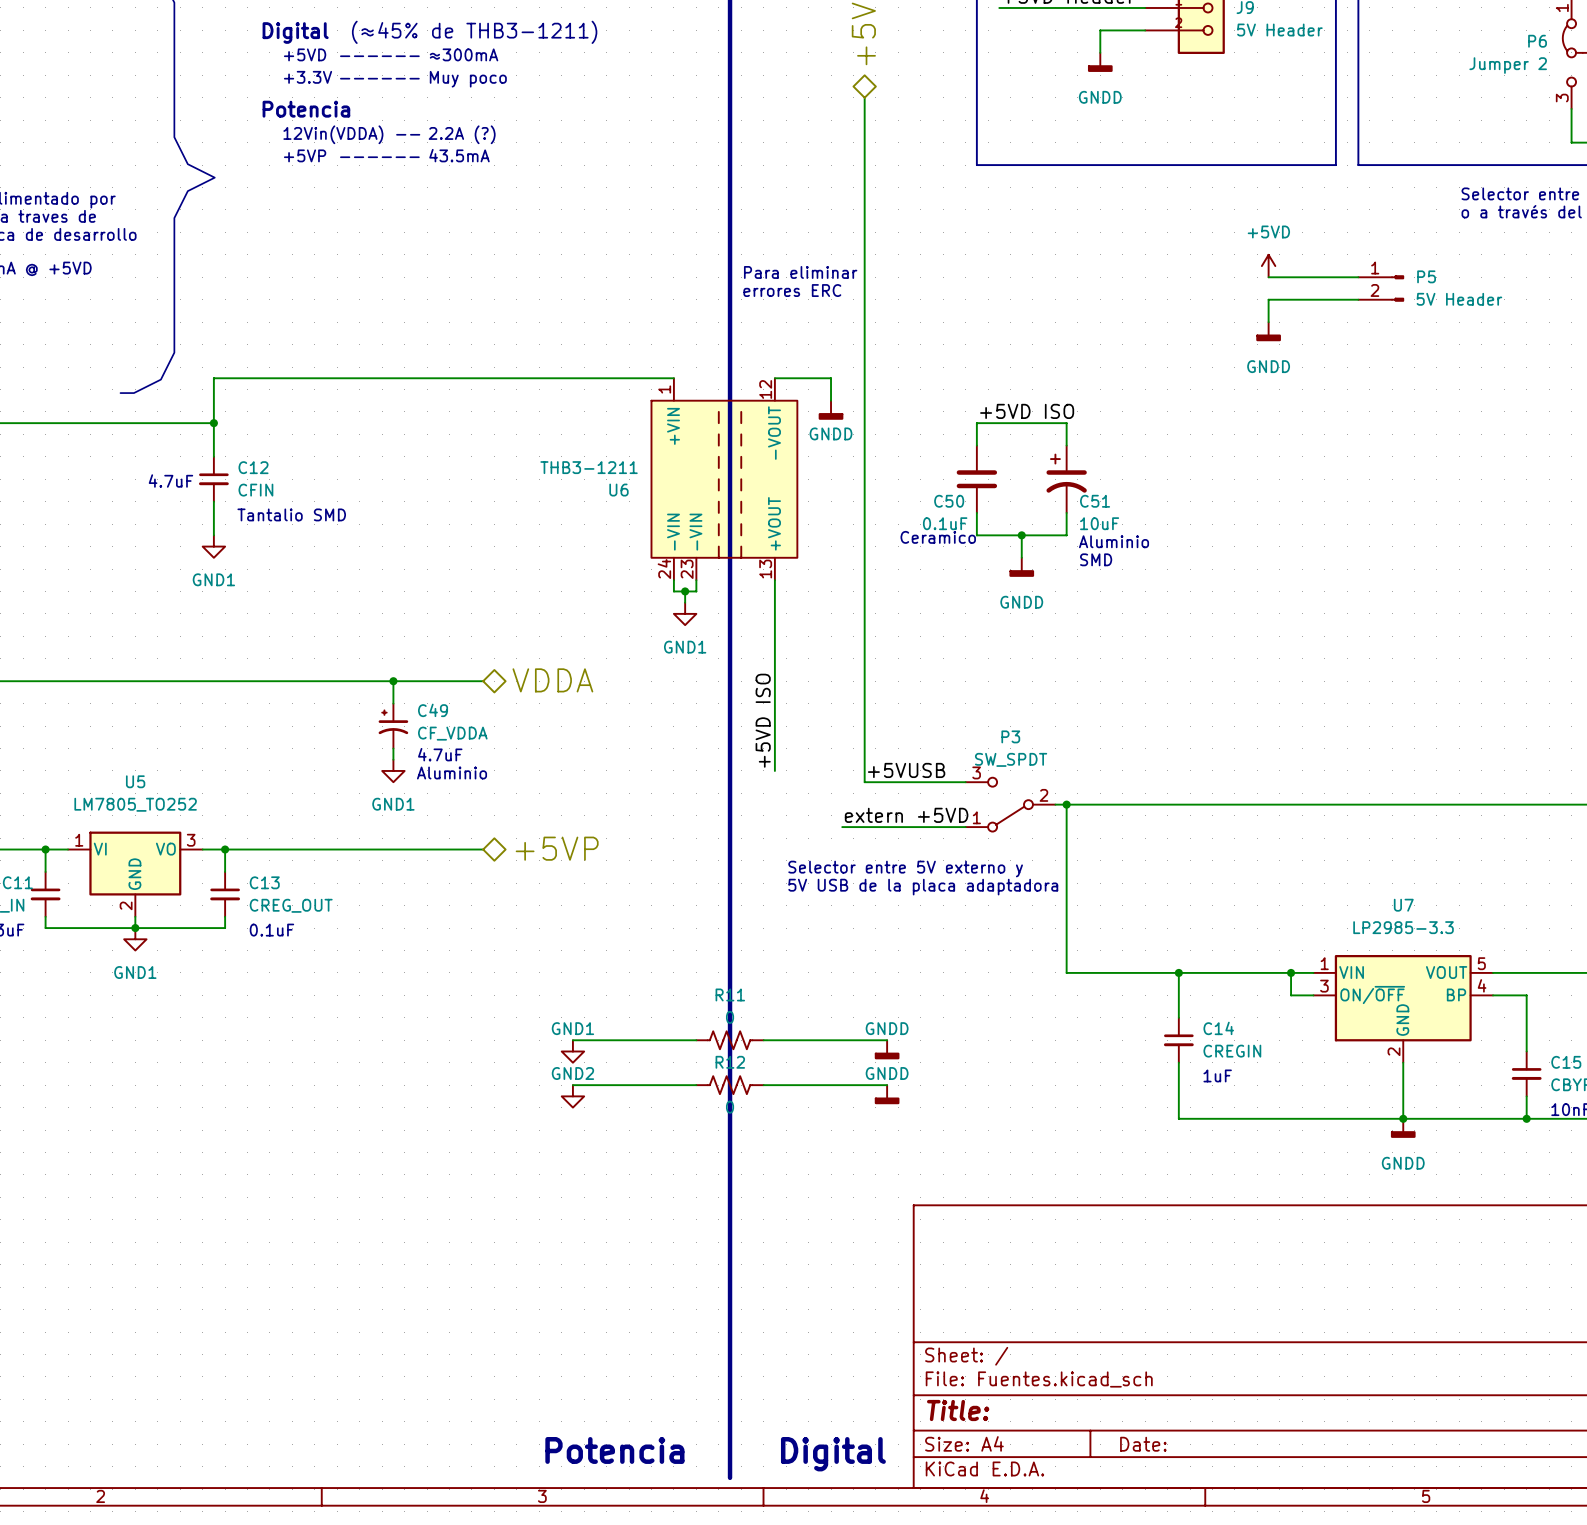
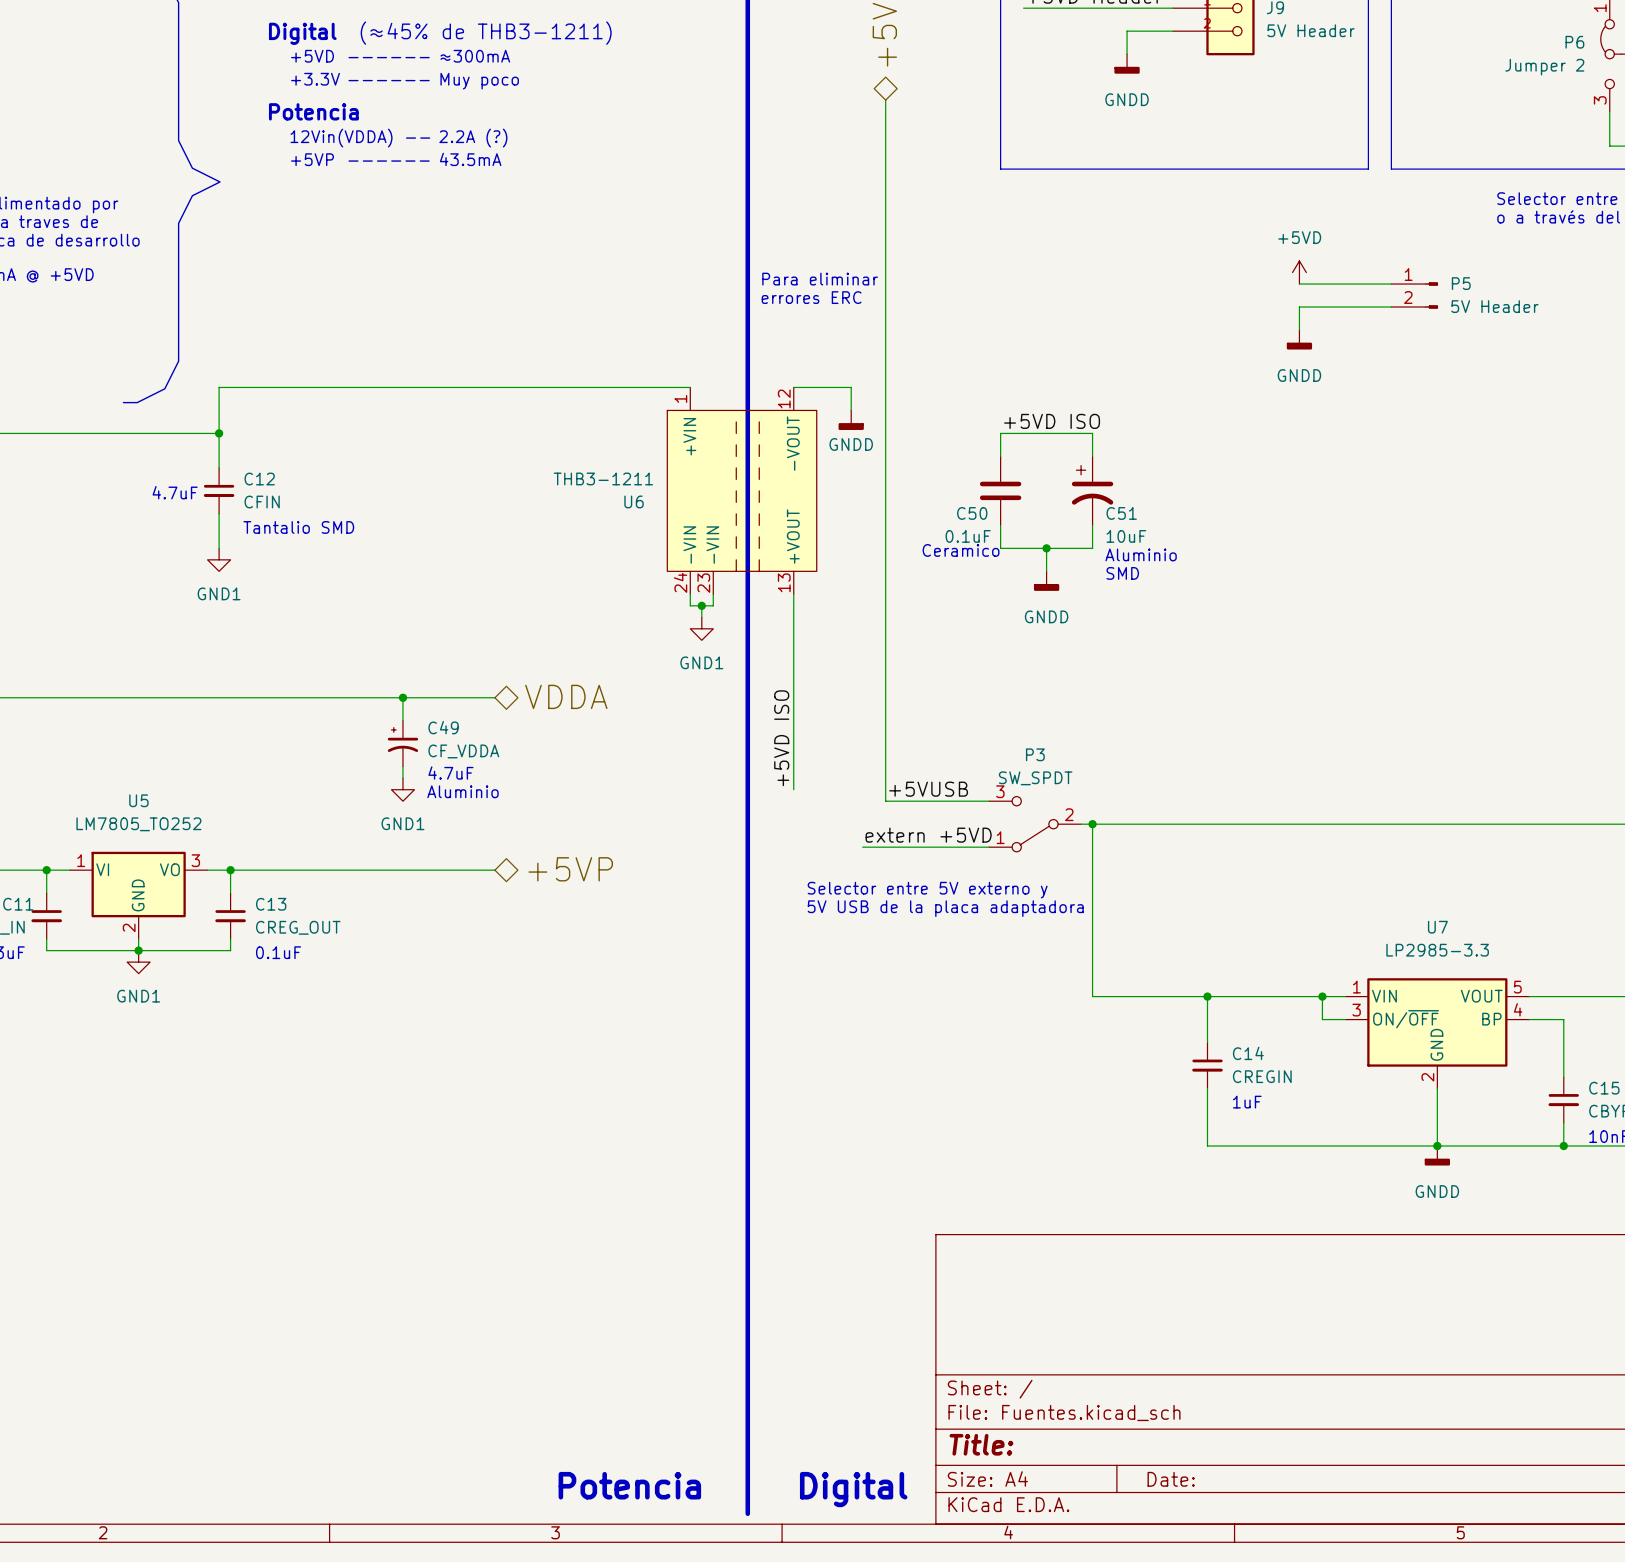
wire: (572, 1040) (696, 1040) -> none
R11: 0 (730, 1040) -> none
wire: (763, 1040) (887, 1040) -> none
power symbol: GNDD (887, 1049) -> none
power symbol: GND1 (572, 1051) -> none
wire: (572, 1085) (696, 1085) -> none
R12: 0 (730, 1085) -> none
wire: (763, 1085) (887, 1085) -> none
power symbol: GNDD (887, 1094) -> none
power symbol: GND2 (572, 1096) -> none

